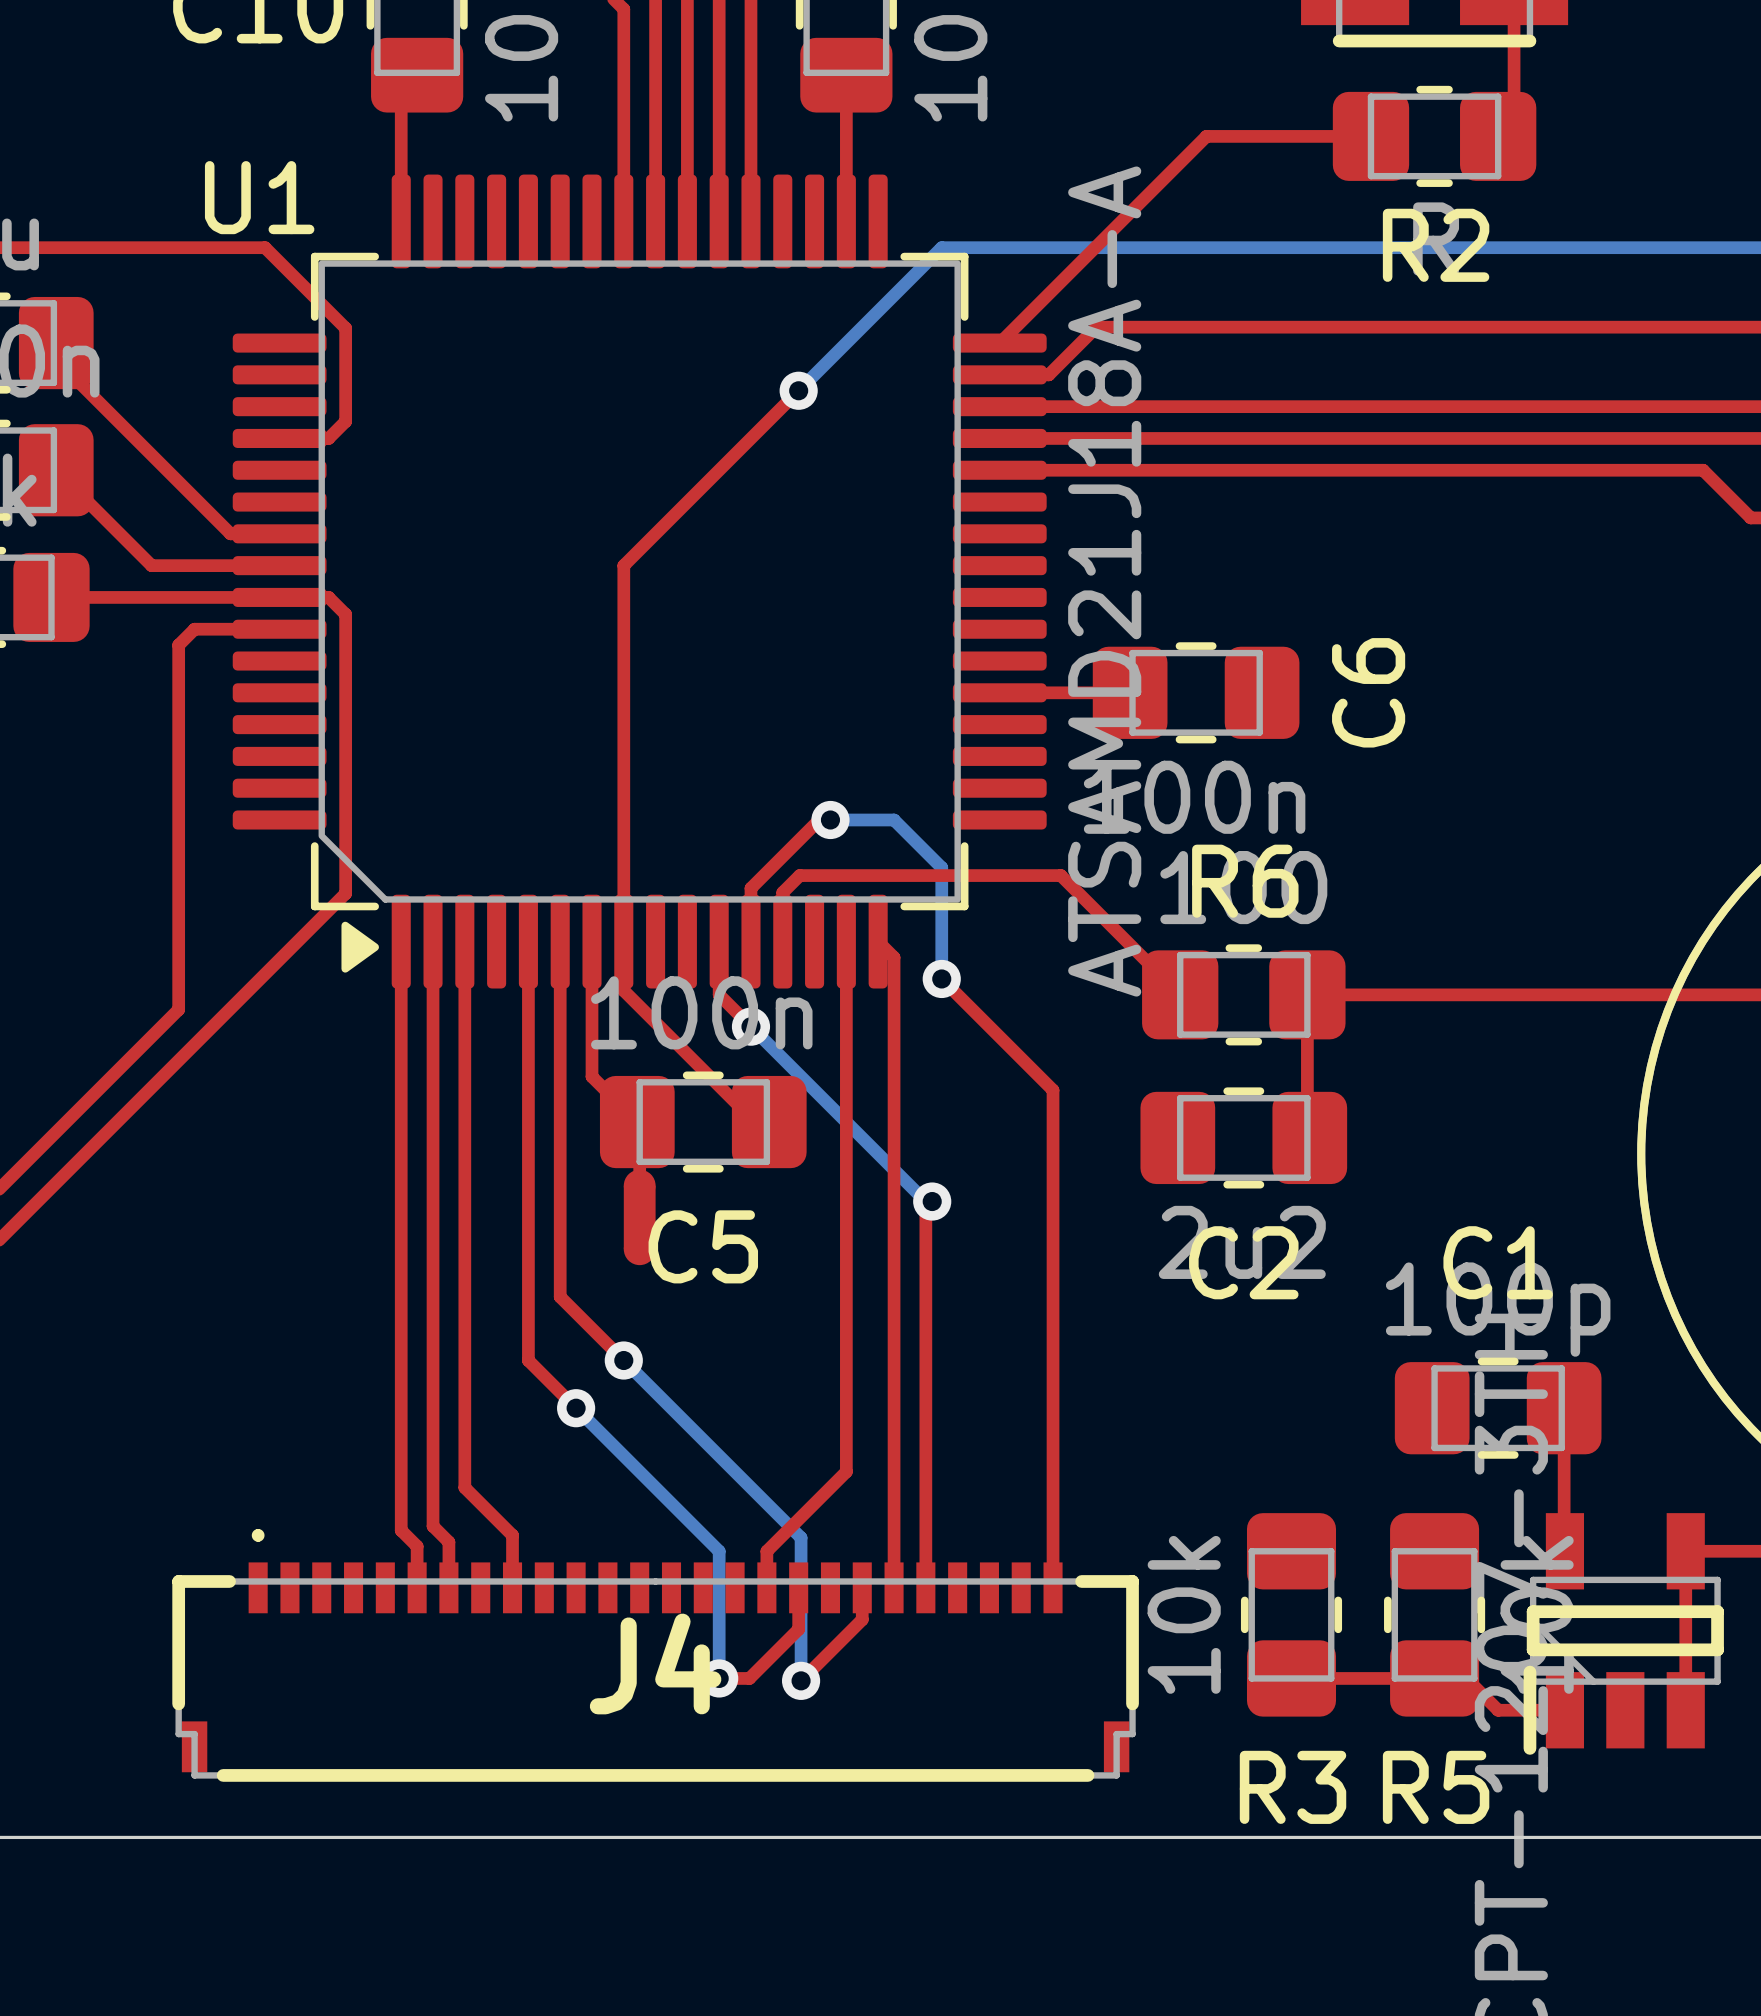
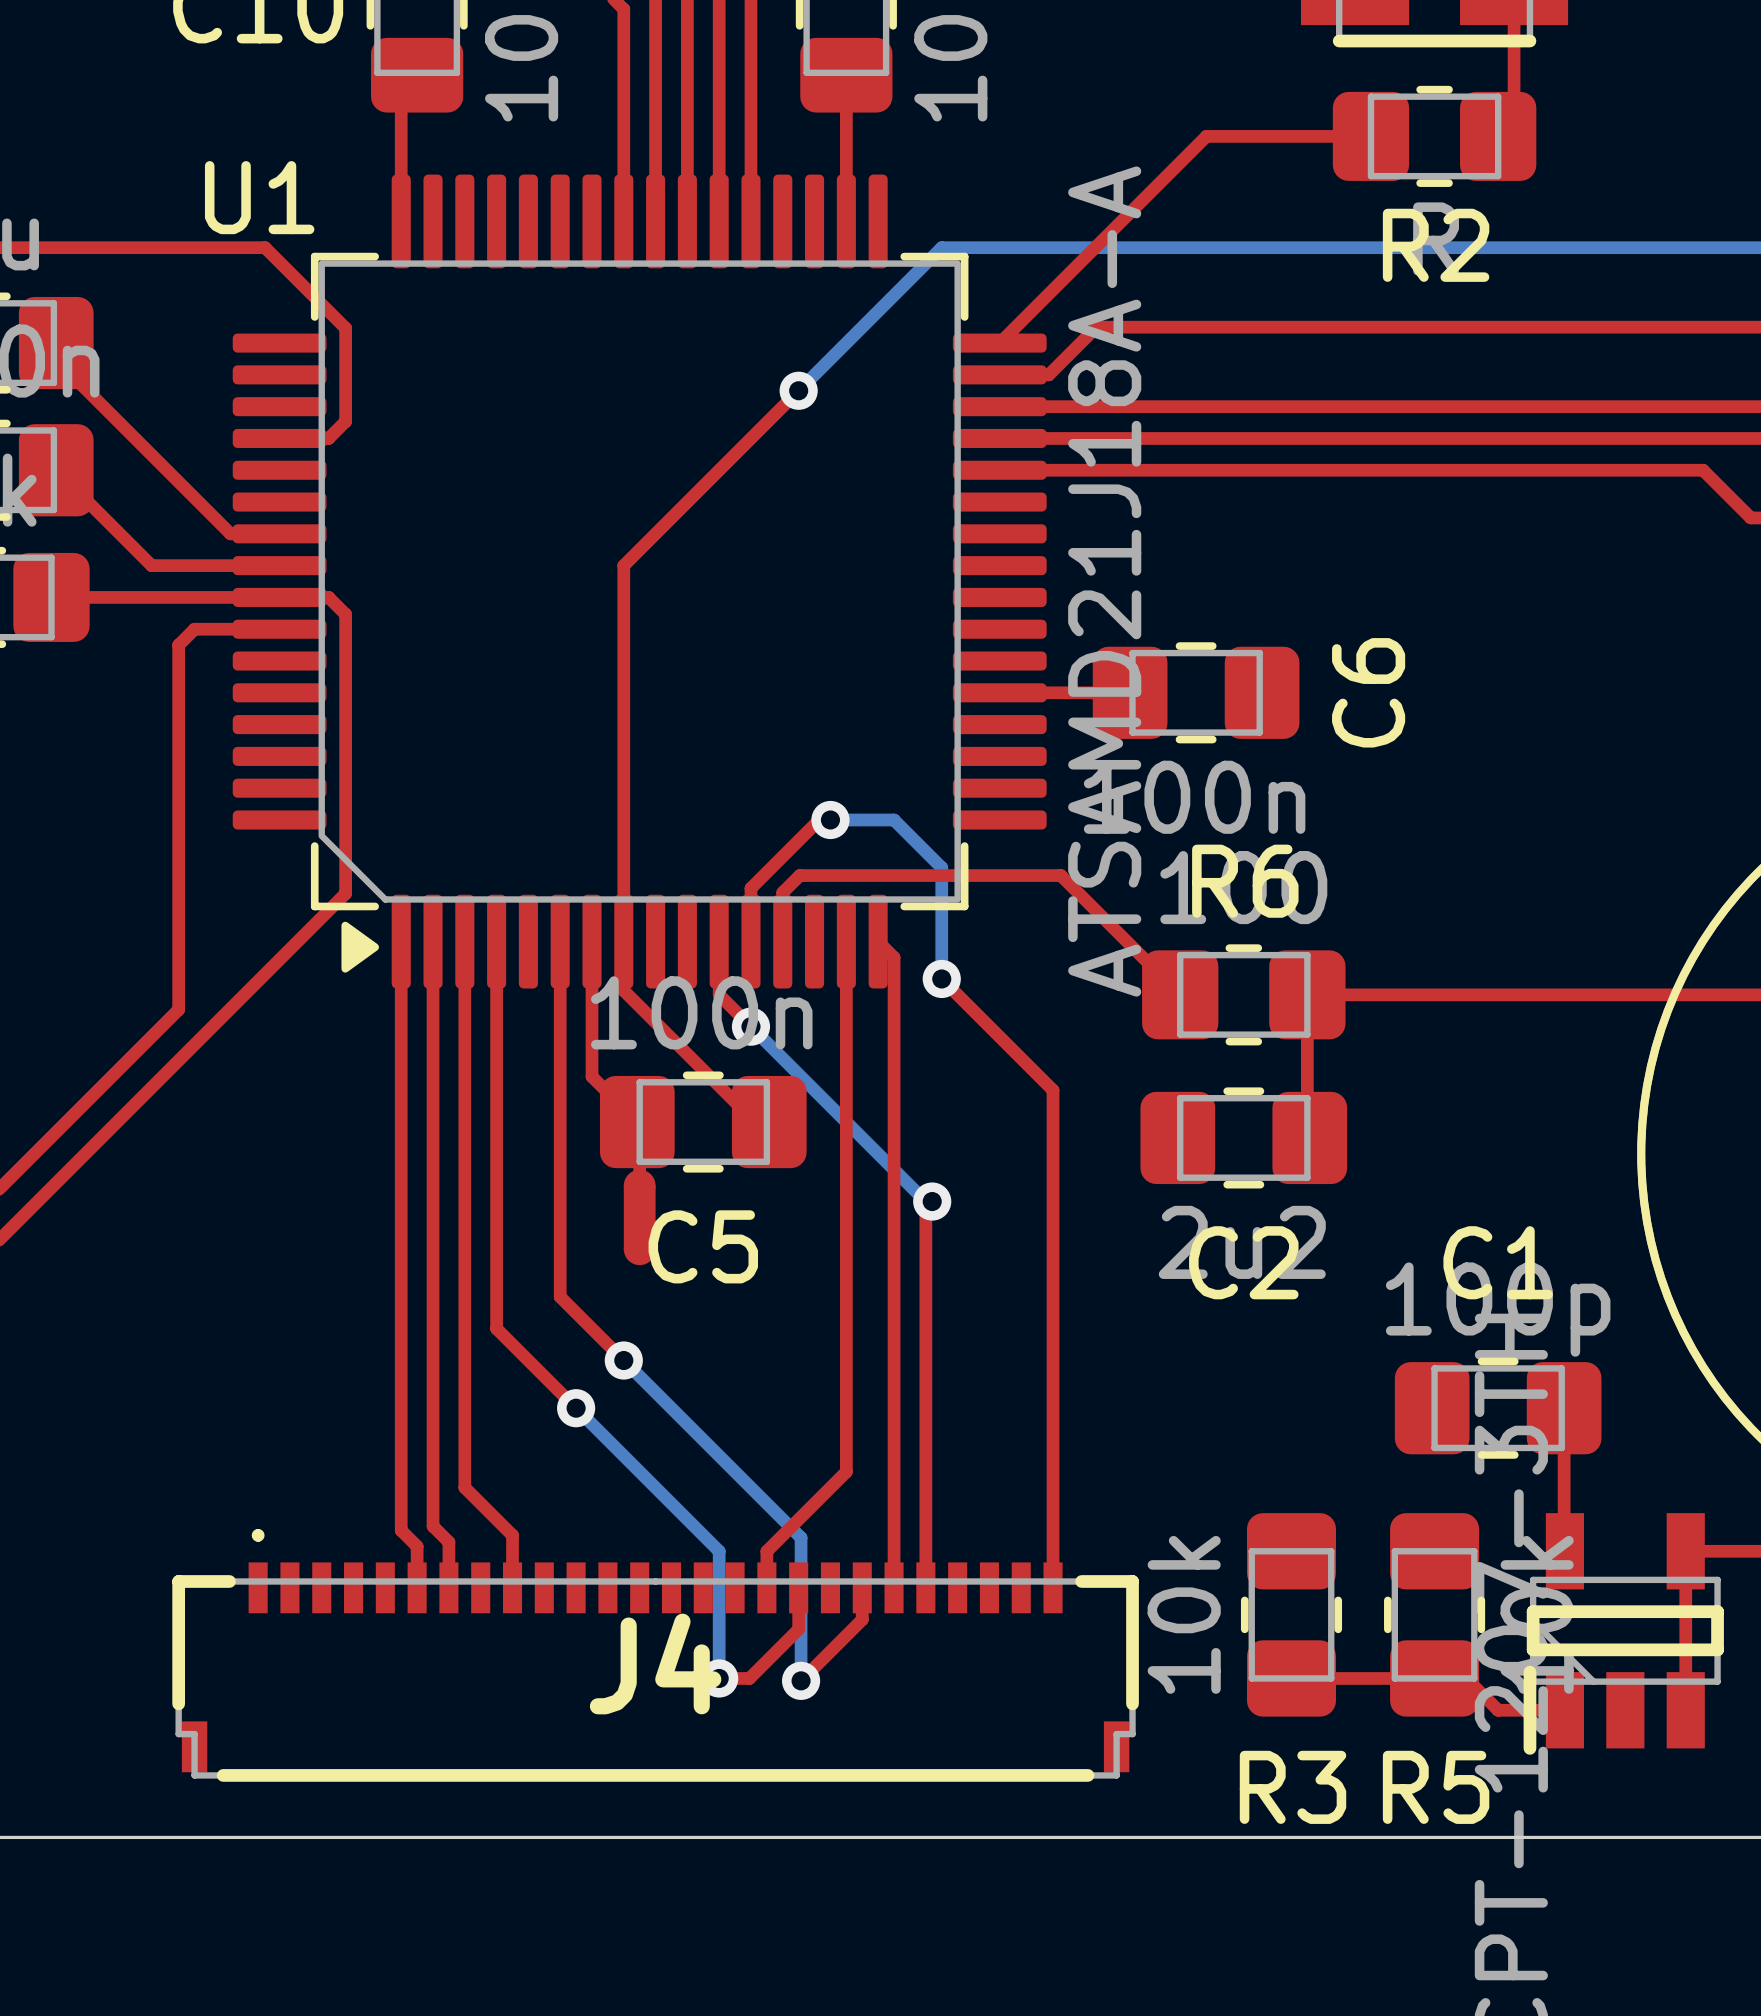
top track: (528, 941) (528, 1360) -> (496, 941) (496, 1328) (528, 1360)

